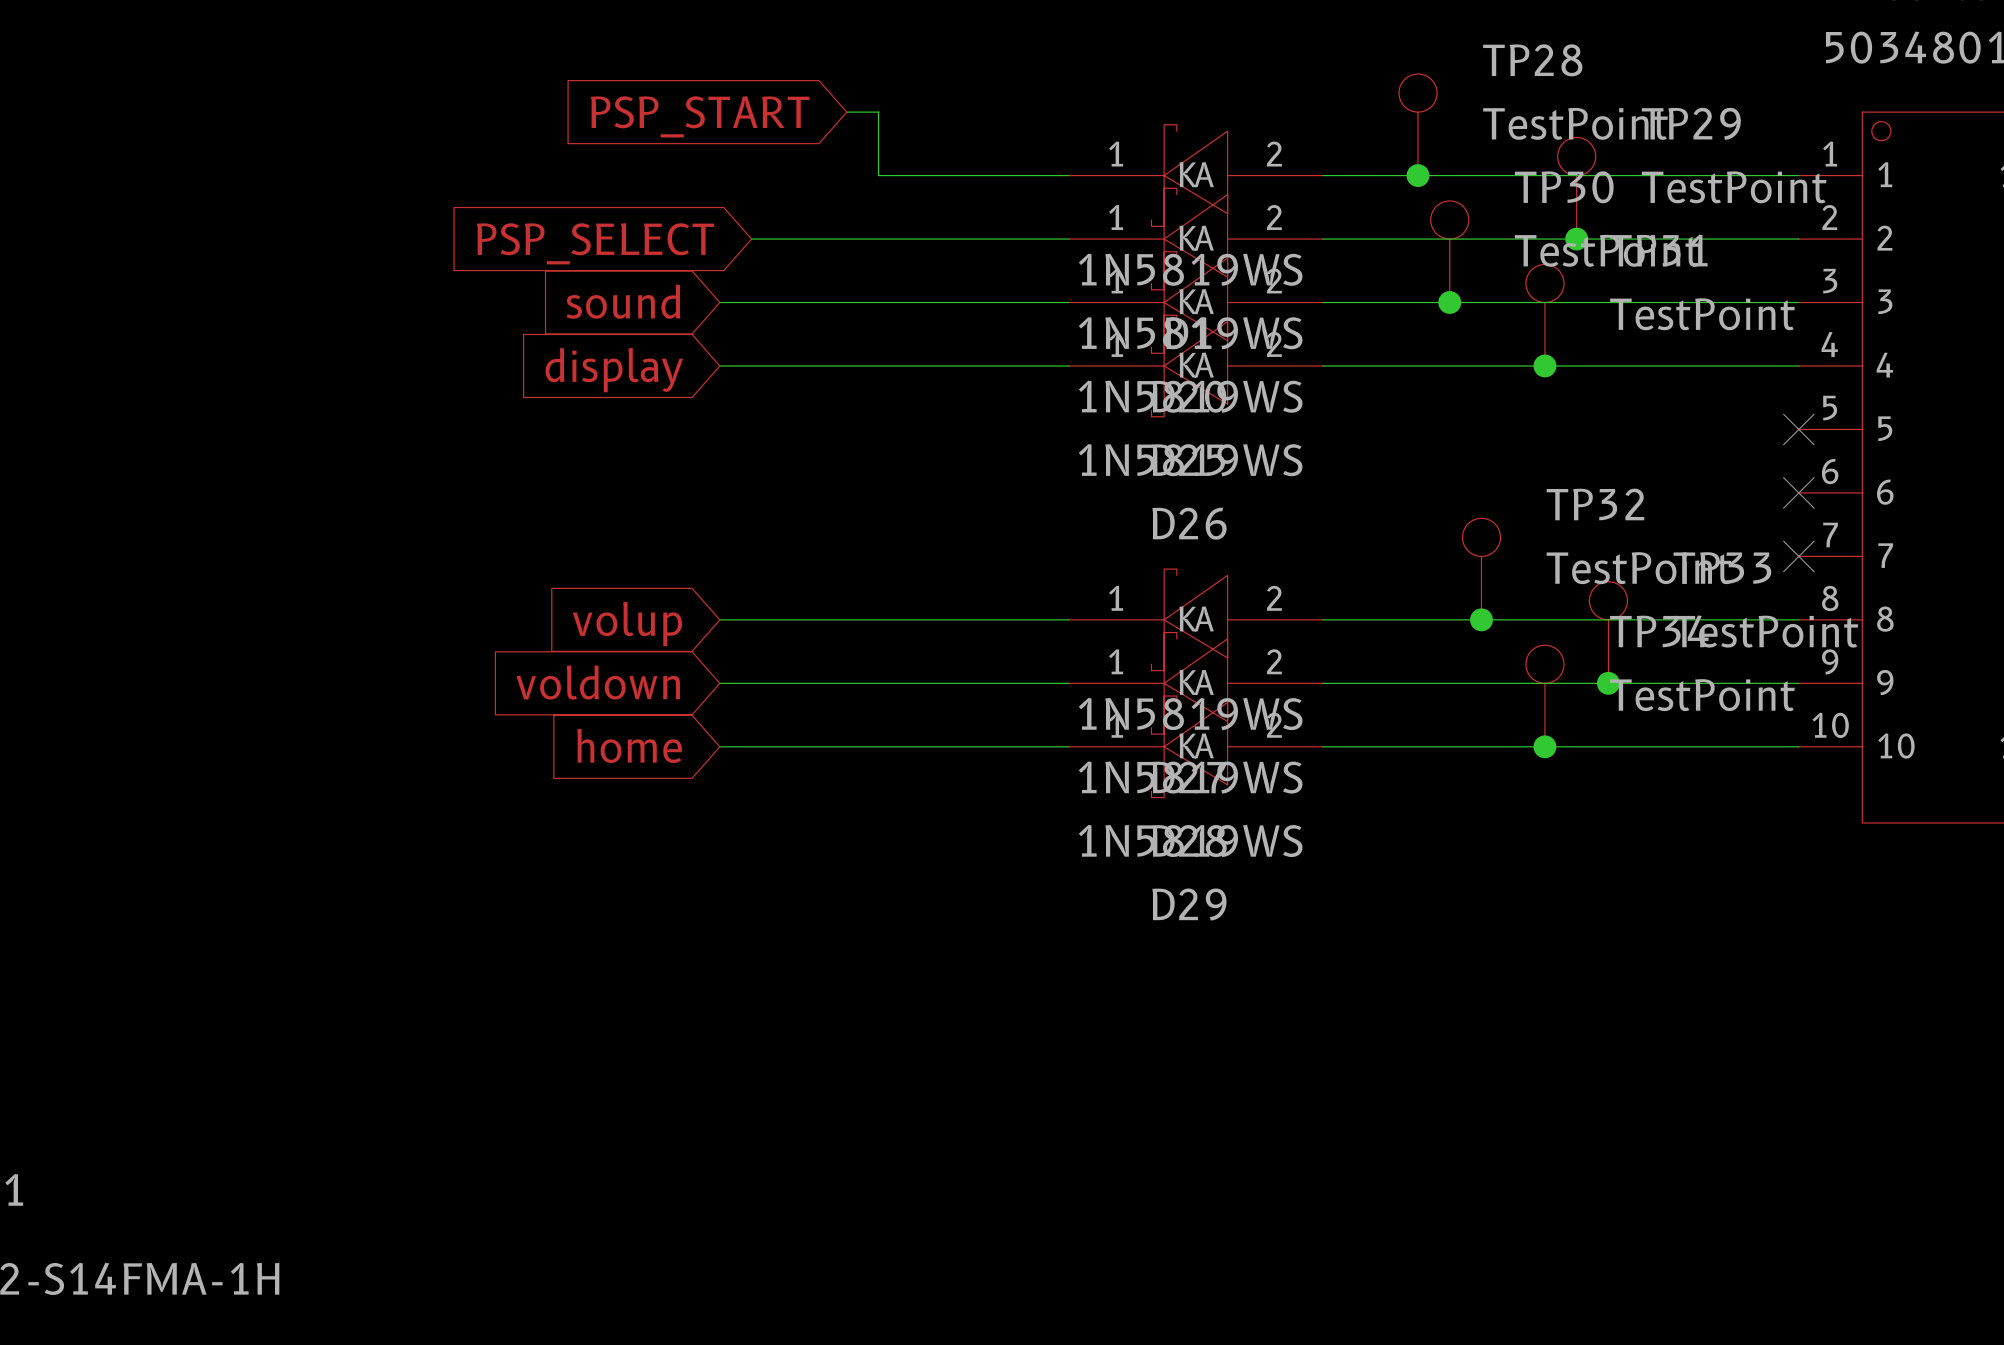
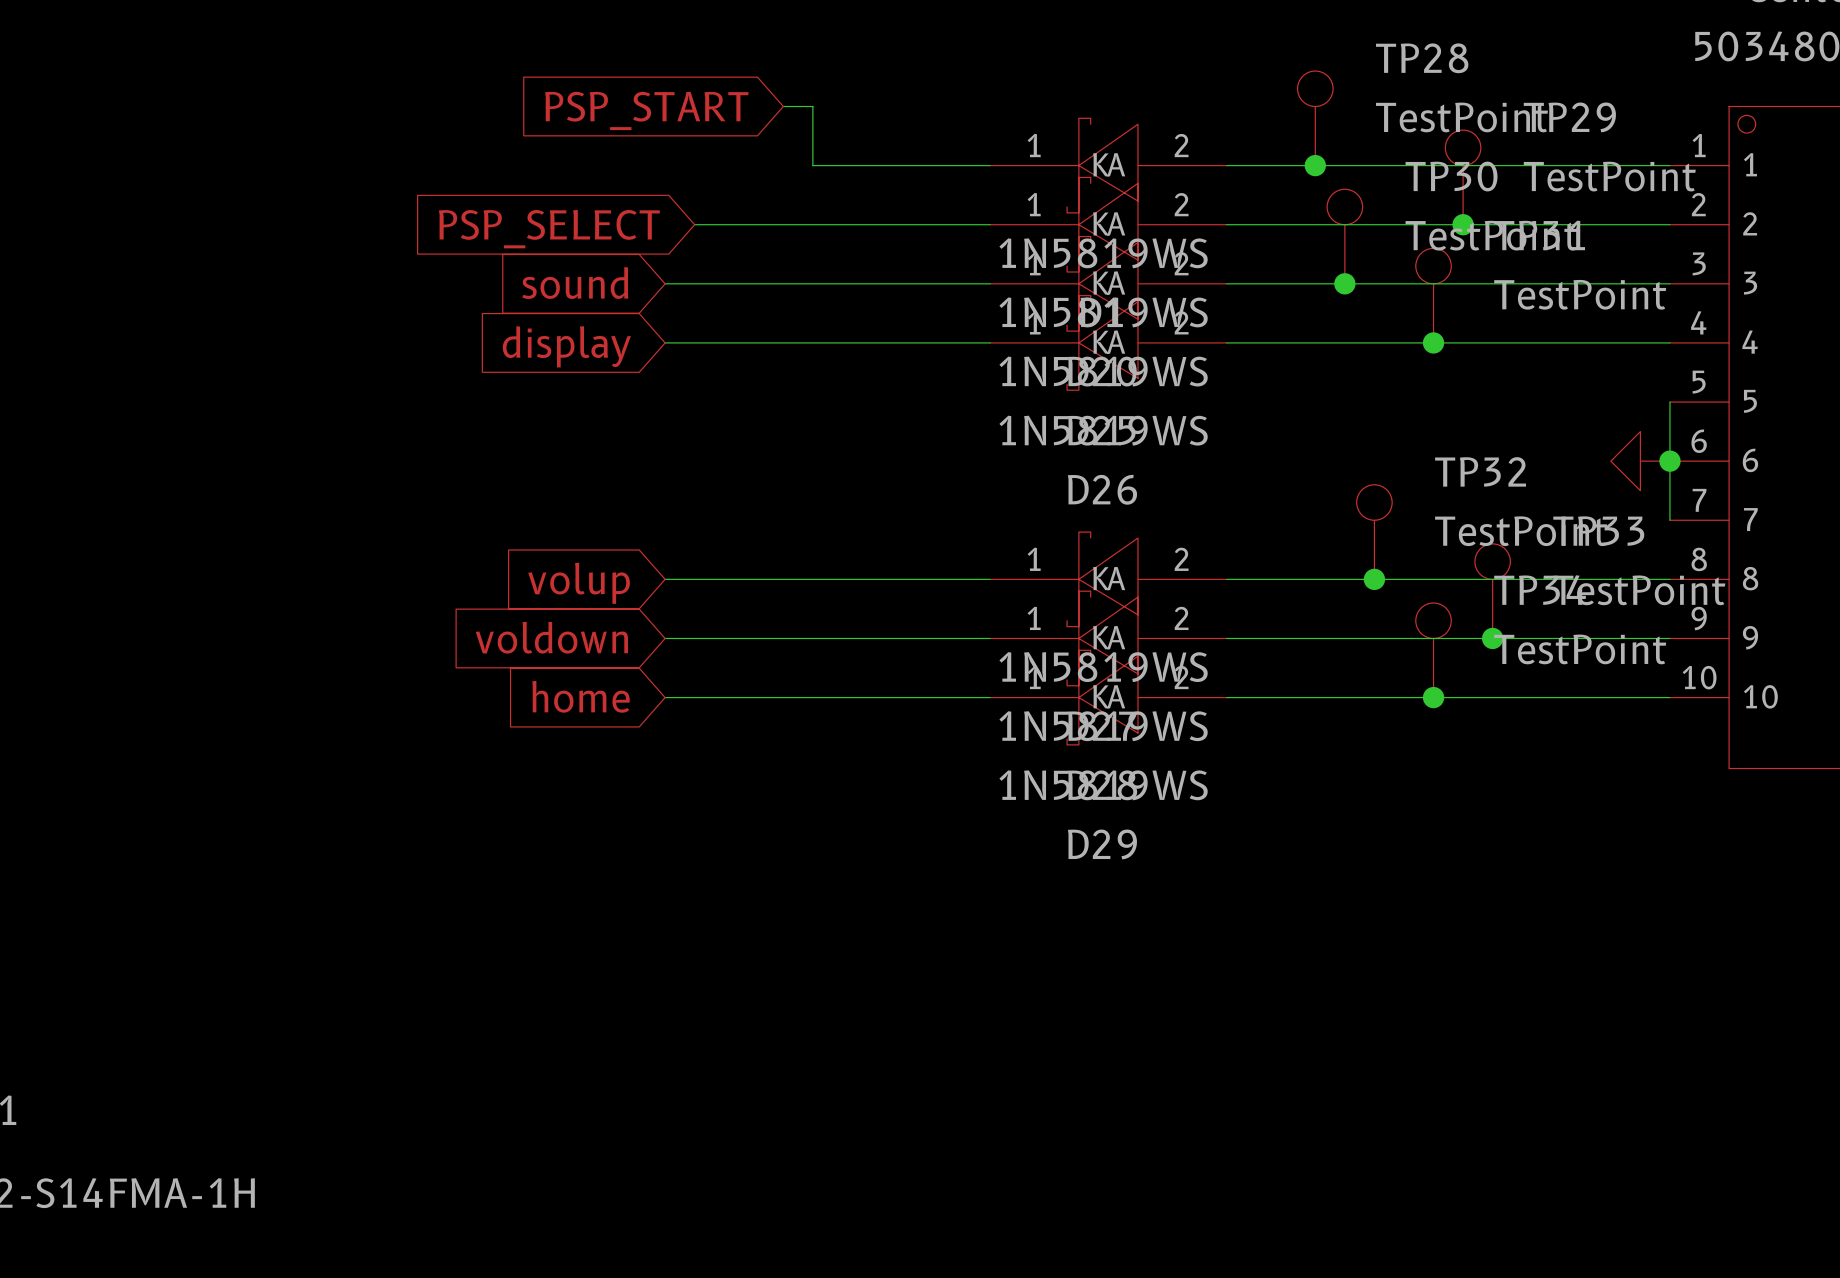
wire: none -> (1669, 402) (1669, 520)
no-connect mark: (1798, 429) -> none
power symbol: none -> (1640, 461)
no-connect mark: (1798, 492) -> none
junction: none -> (1669, 461)
no-connect mark: (1798, 556) -> none

